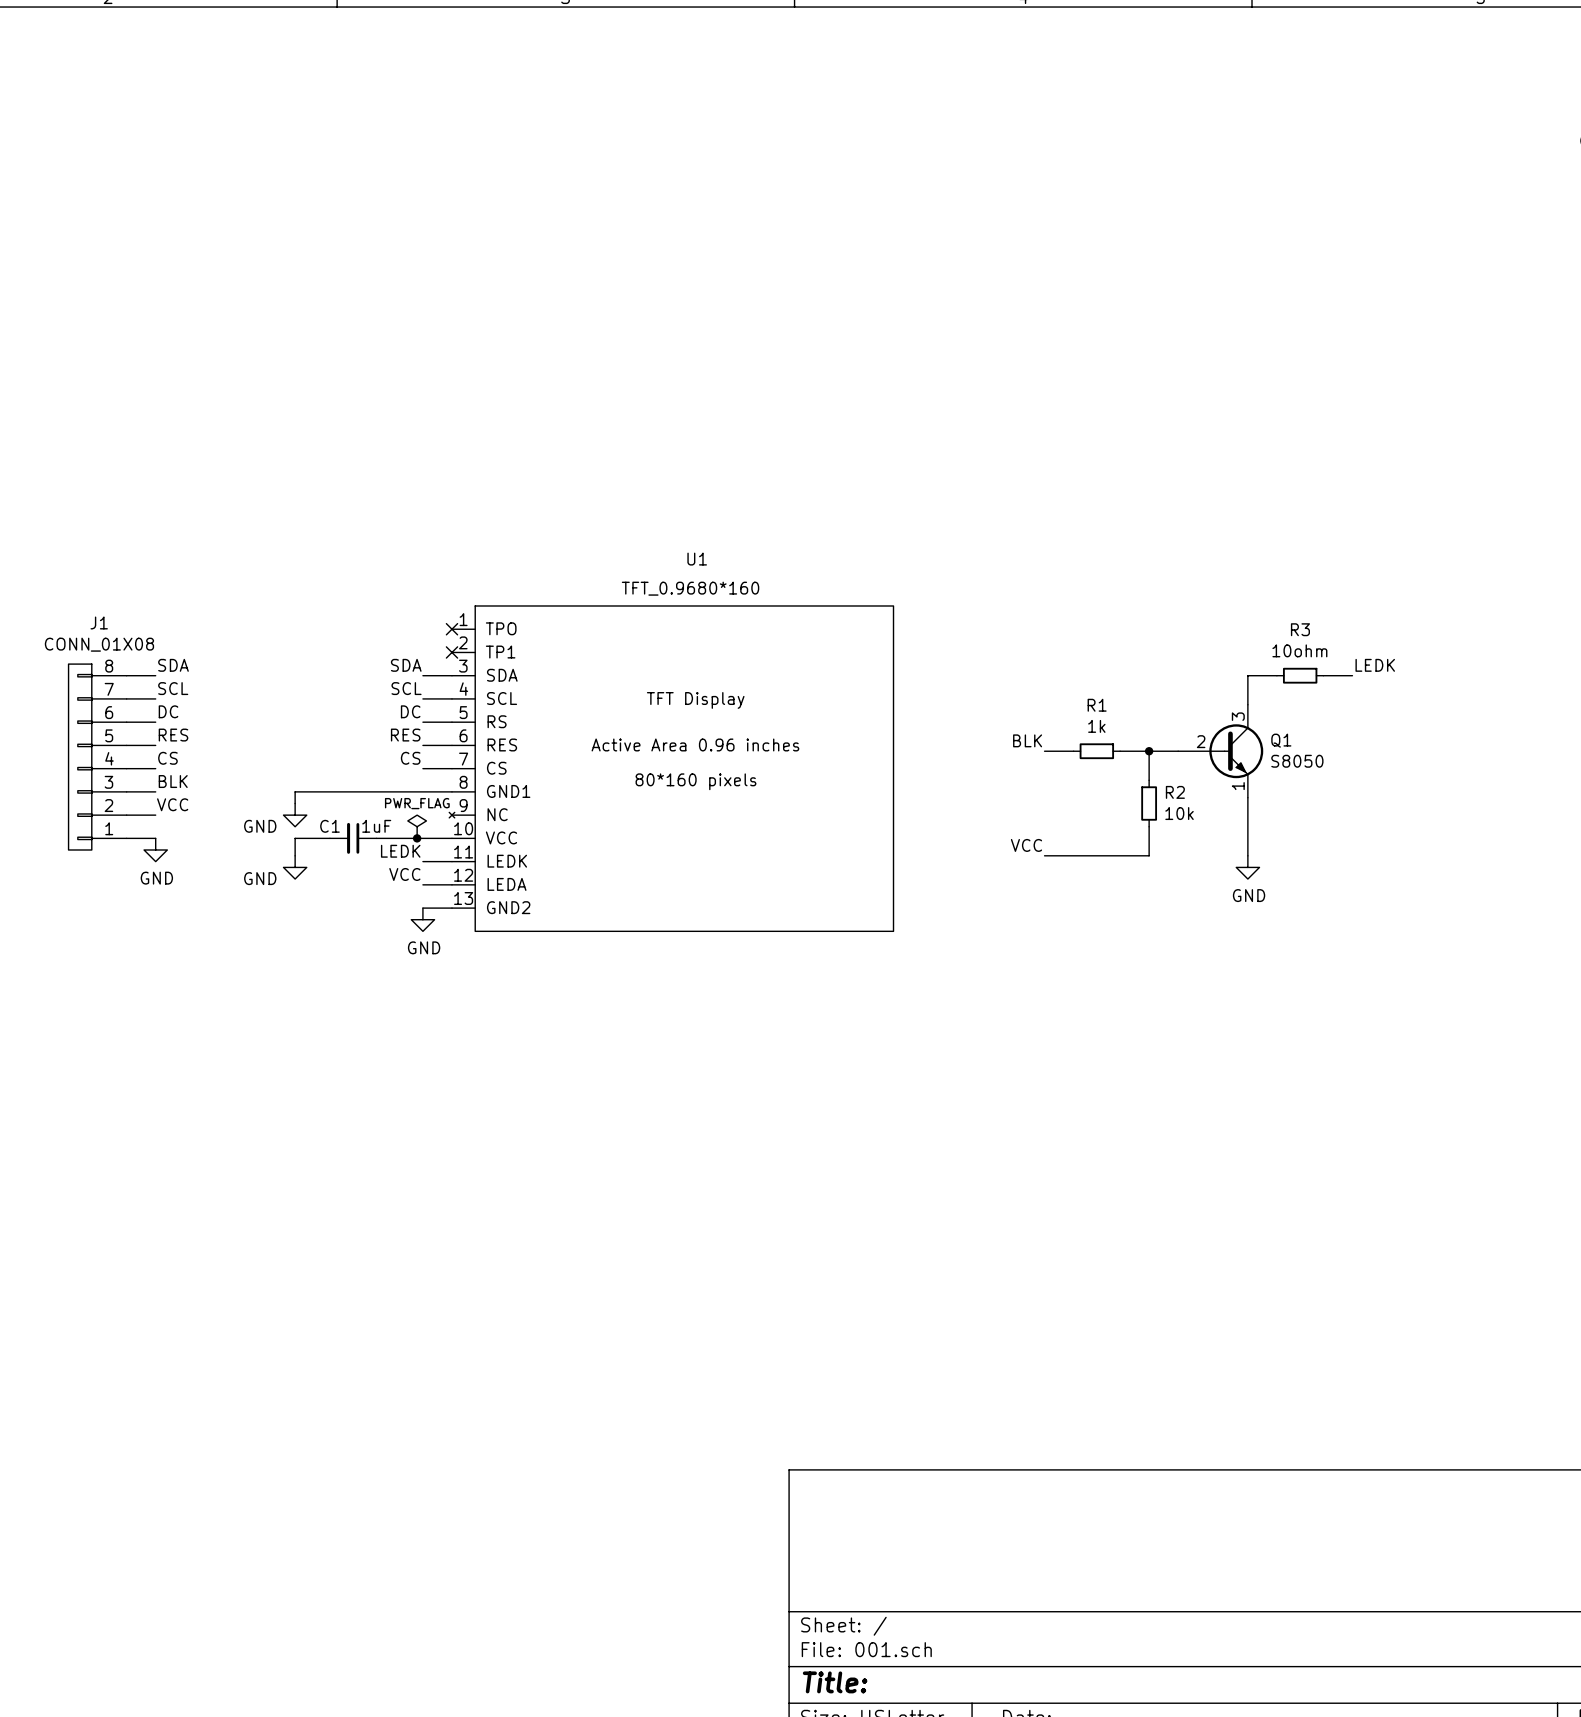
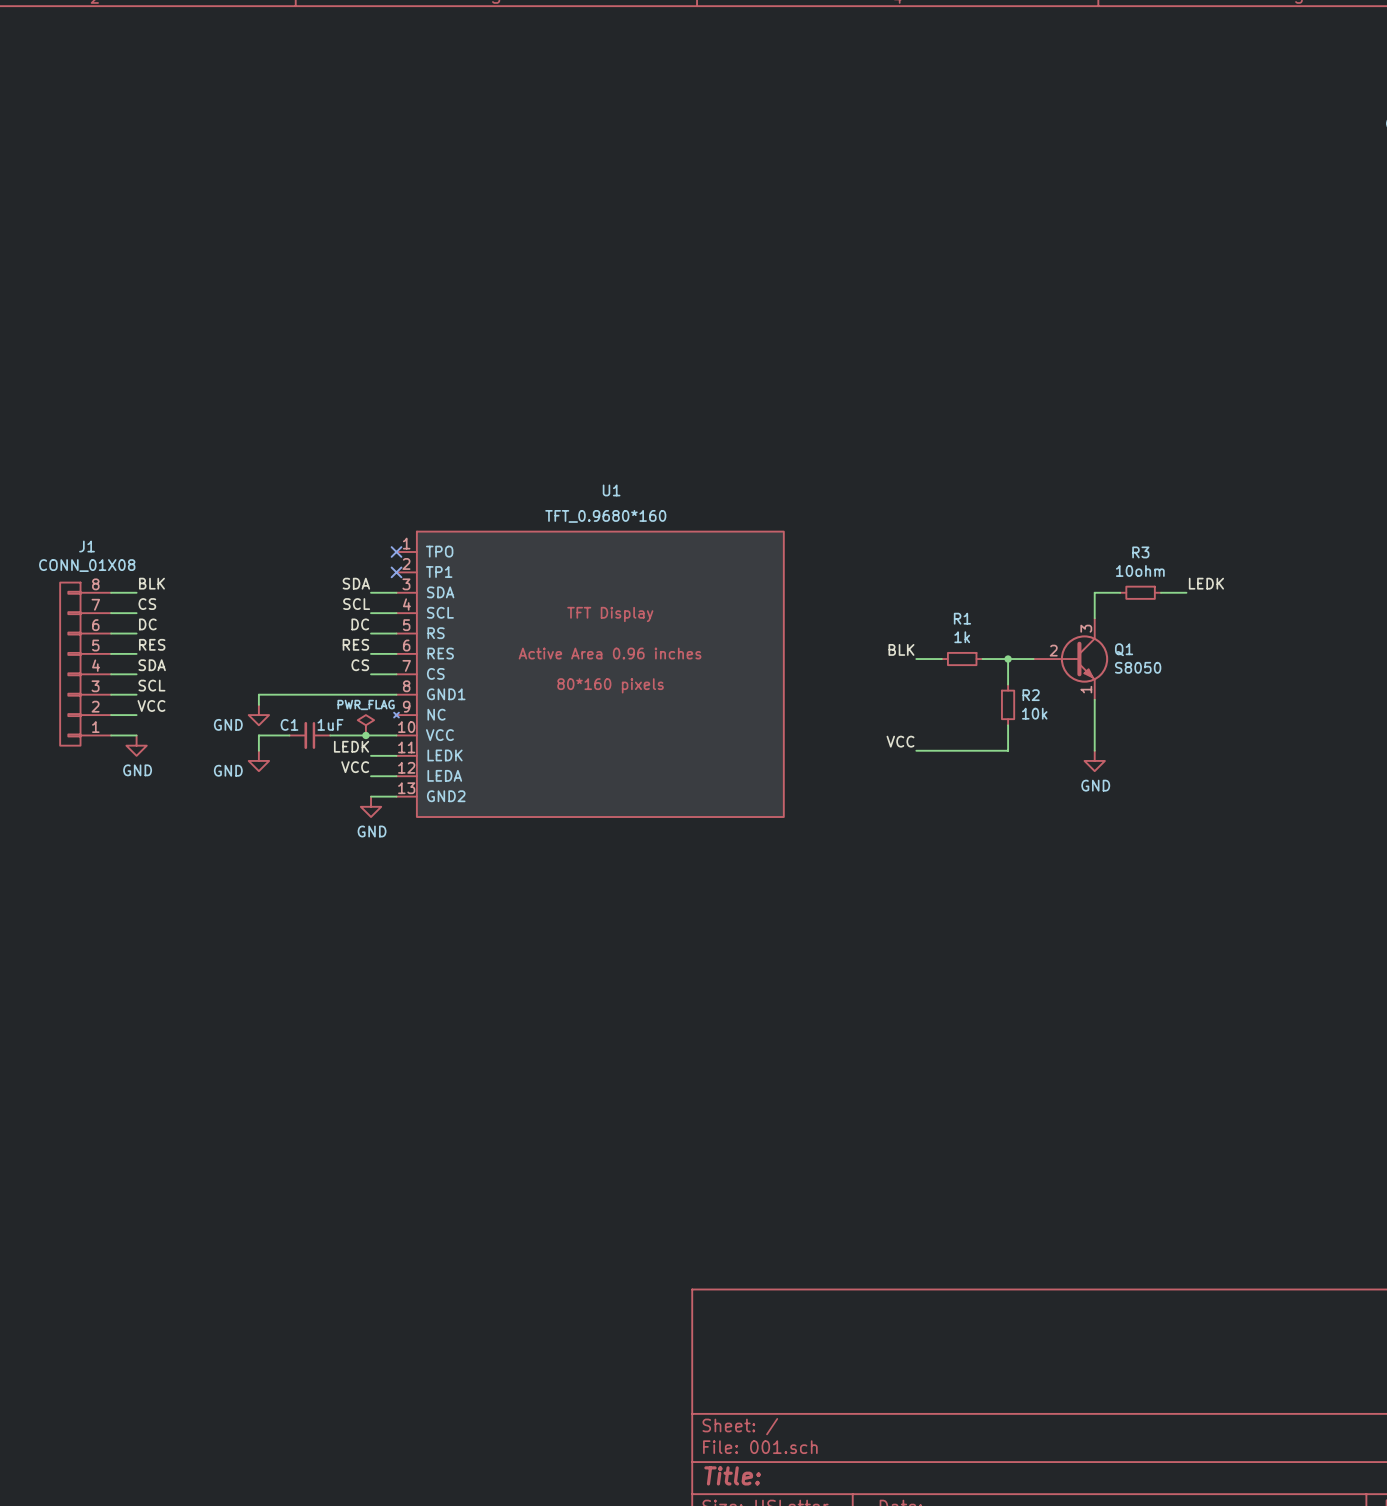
label: SDA (173, 665) -> BLK (151, 583)
label: SCL (173, 688) -> CS (147, 604)
label: CS (167, 758) -> SDA (152, 665)
label: BLK (173, 781) -> SCL (151, 685)

